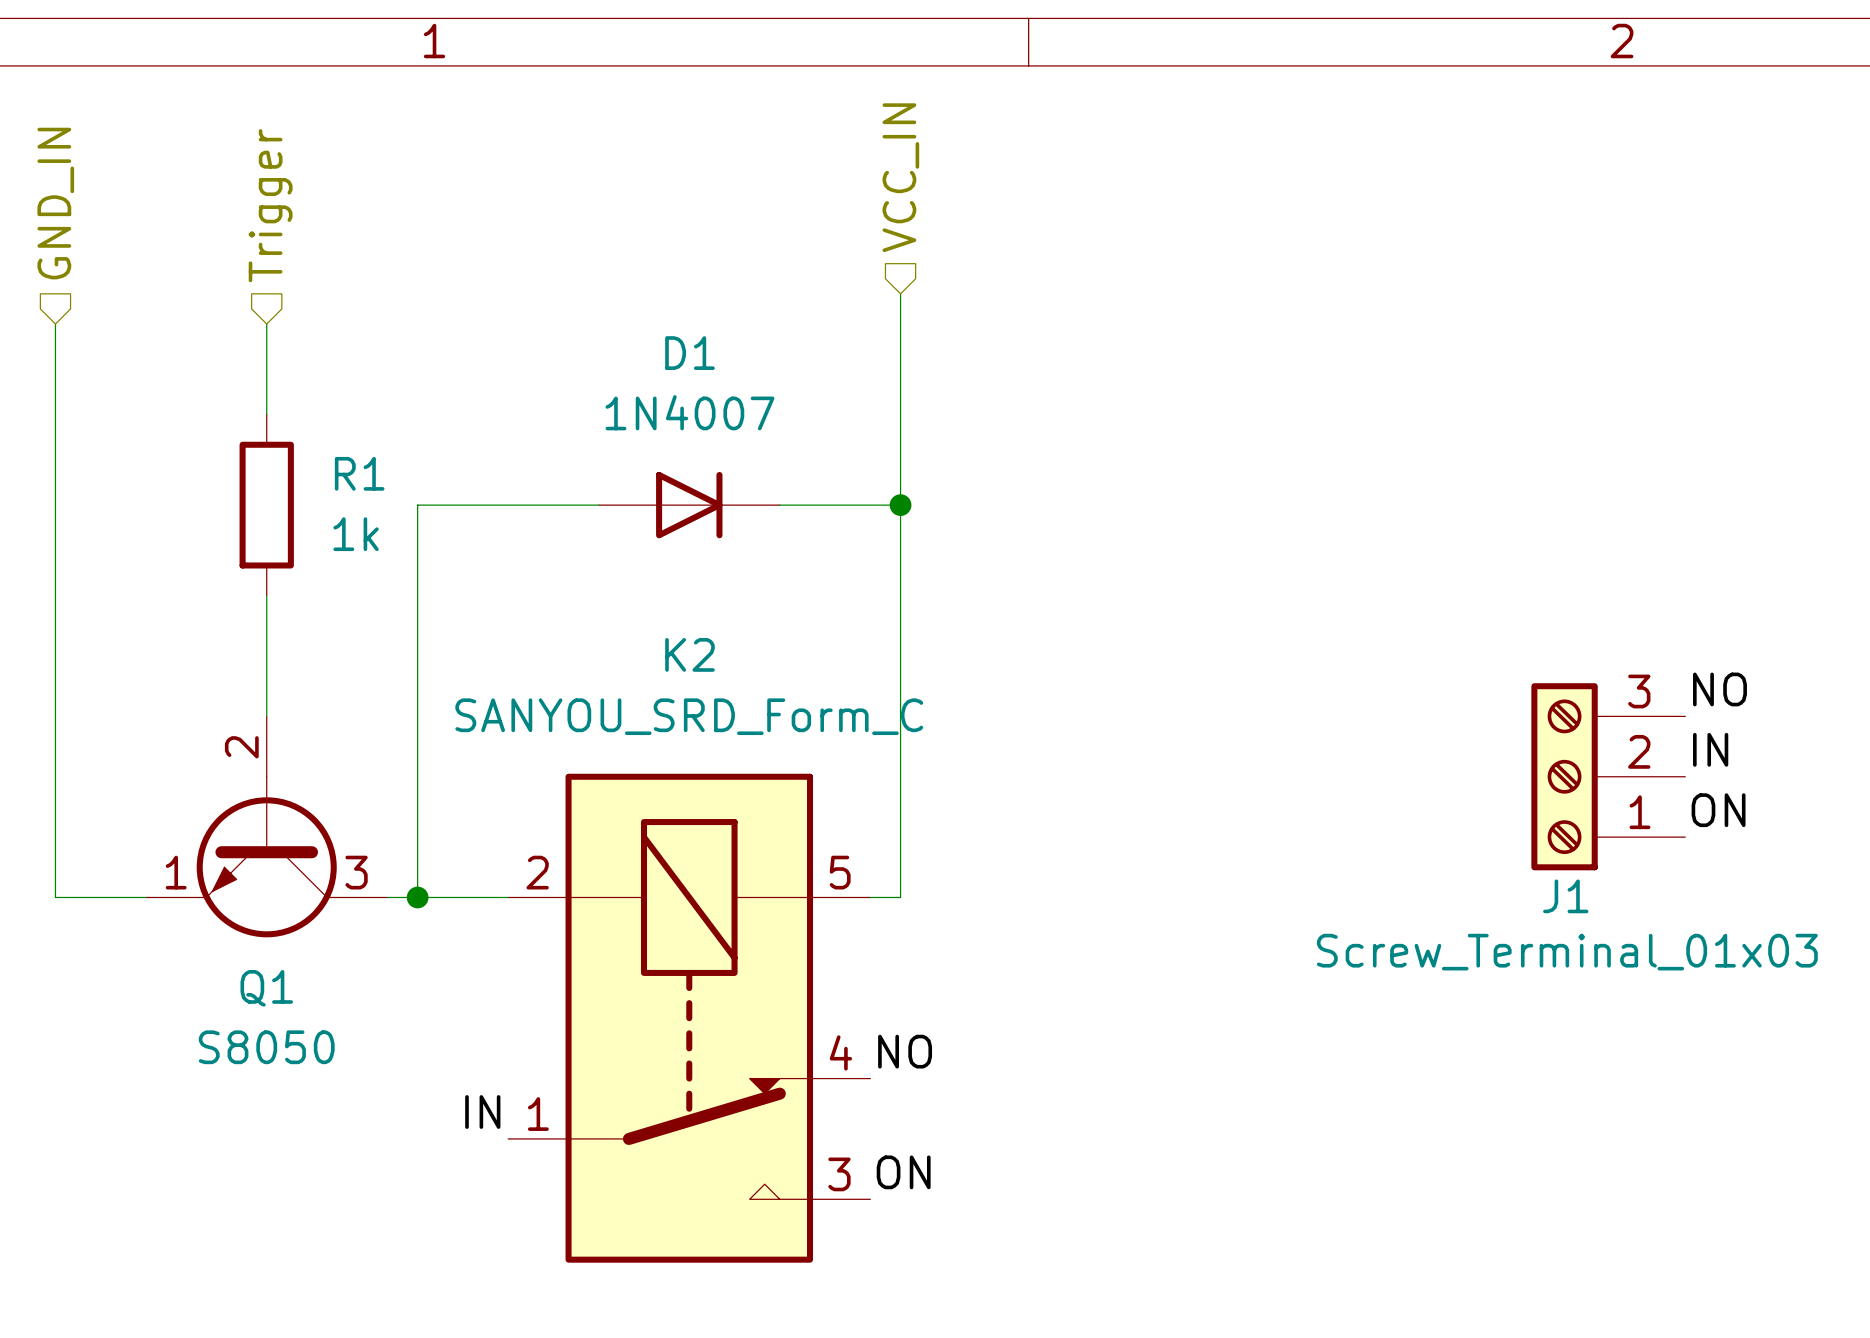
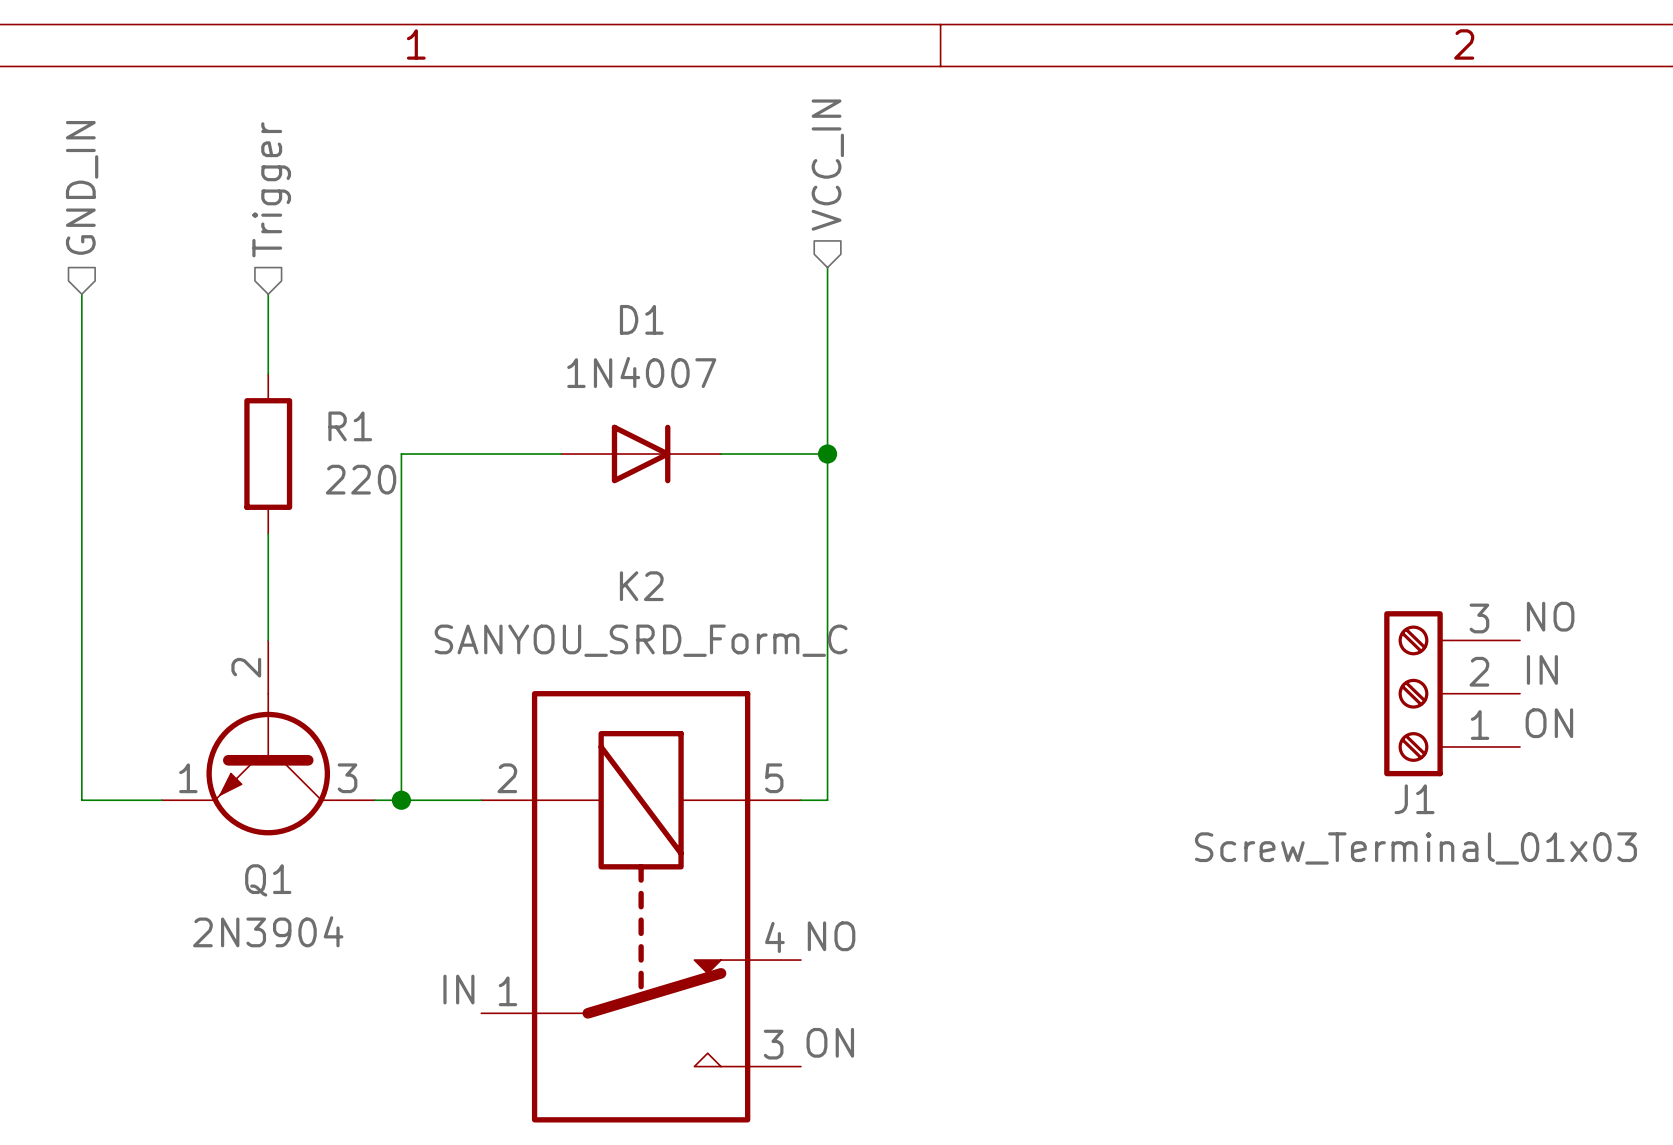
R1 value: 1k (356, 534) -> 220 (361, 479)
Q1 value: S8050 (266, 1047) -> 2N3904 (268, 931)

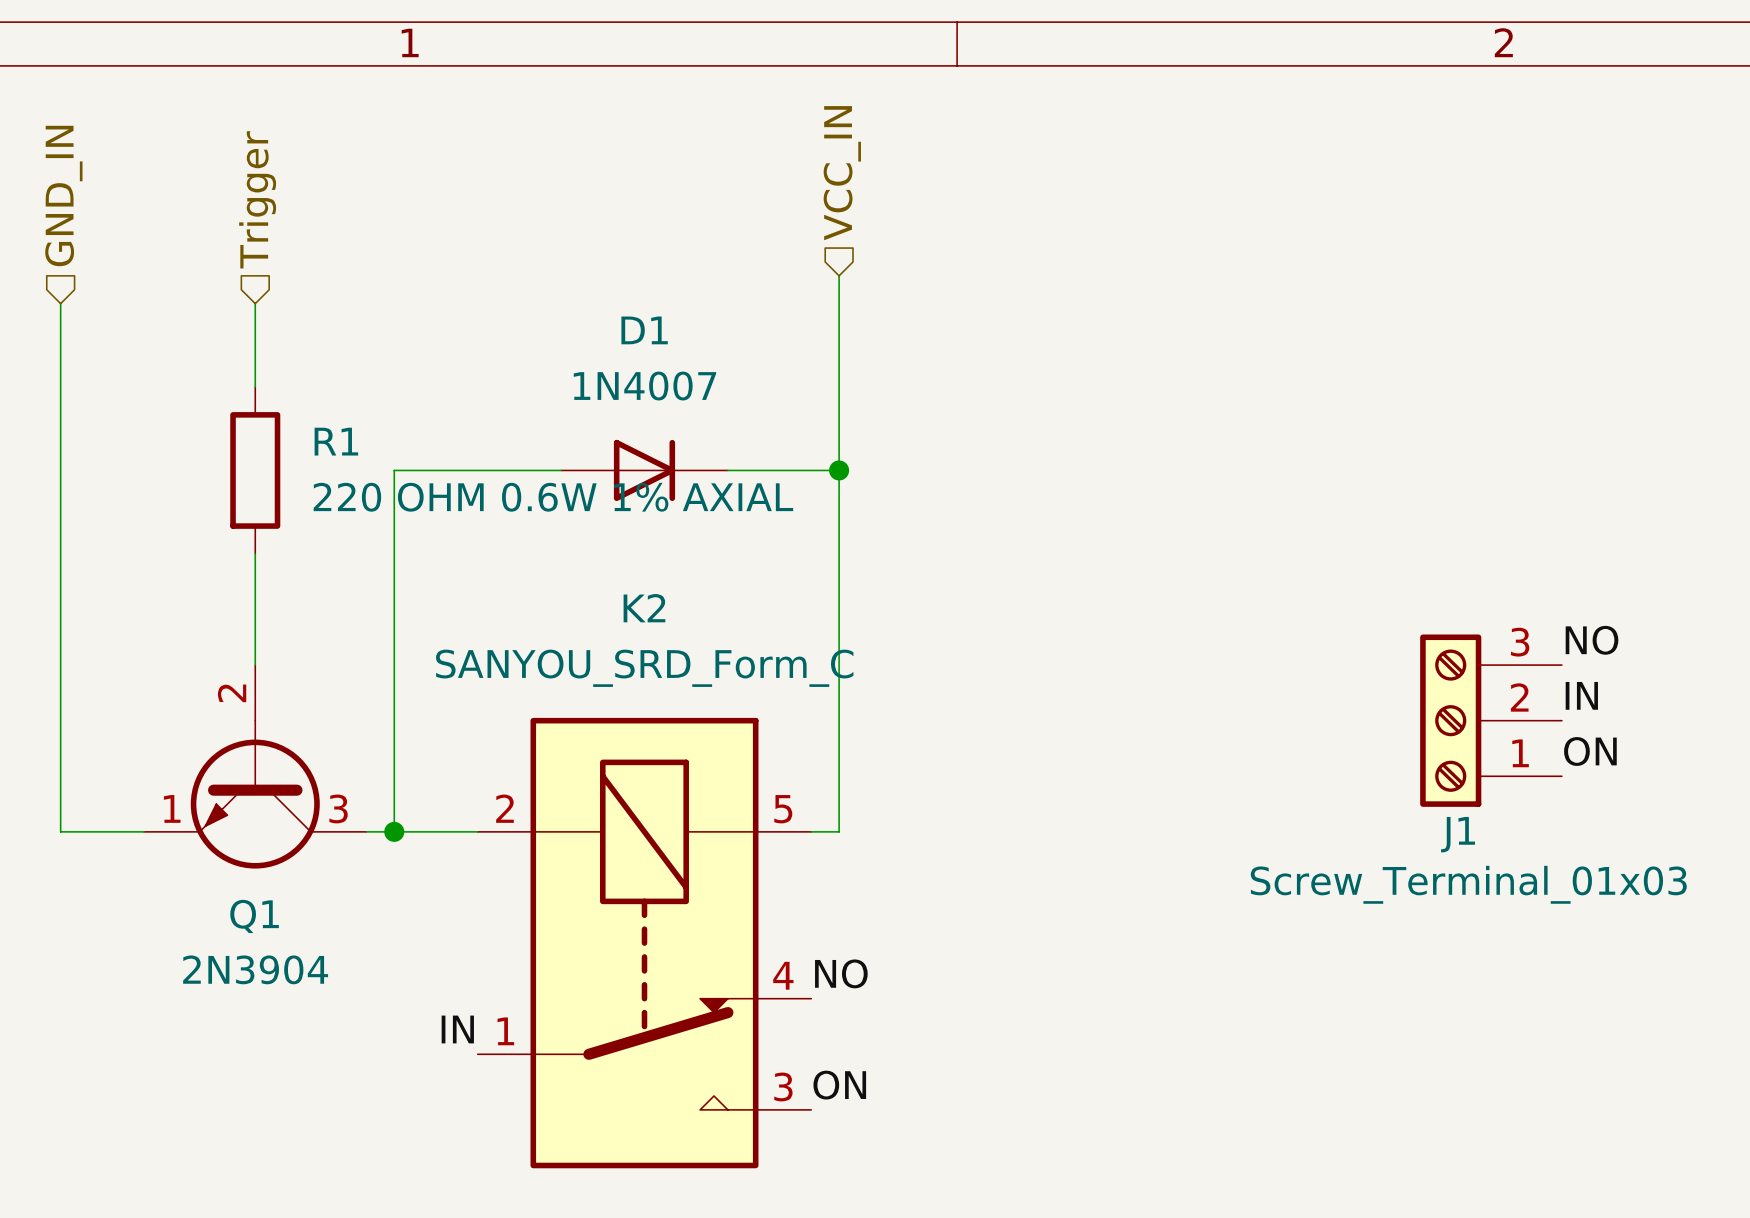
R1 value: 220 (361, 479) -> 220 OHM 0.6W 1% AXIAL (553, 497)

